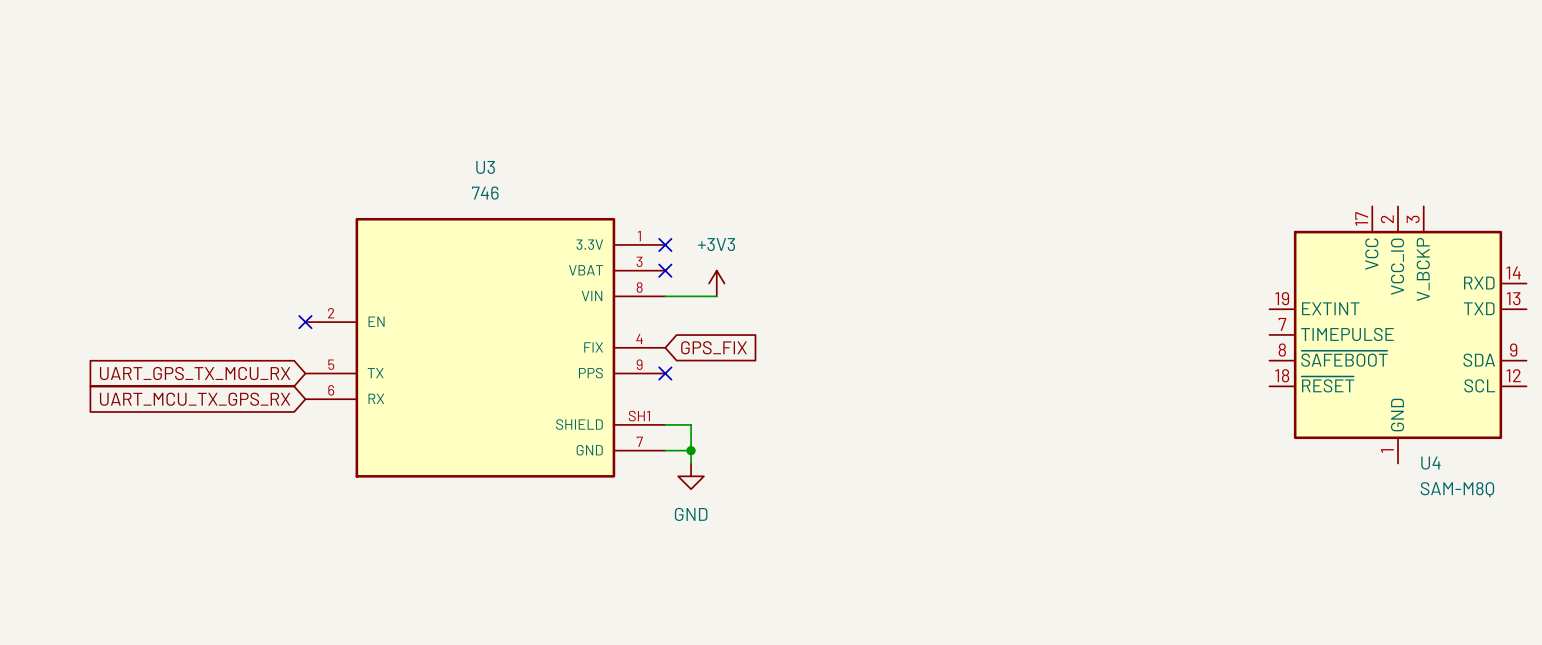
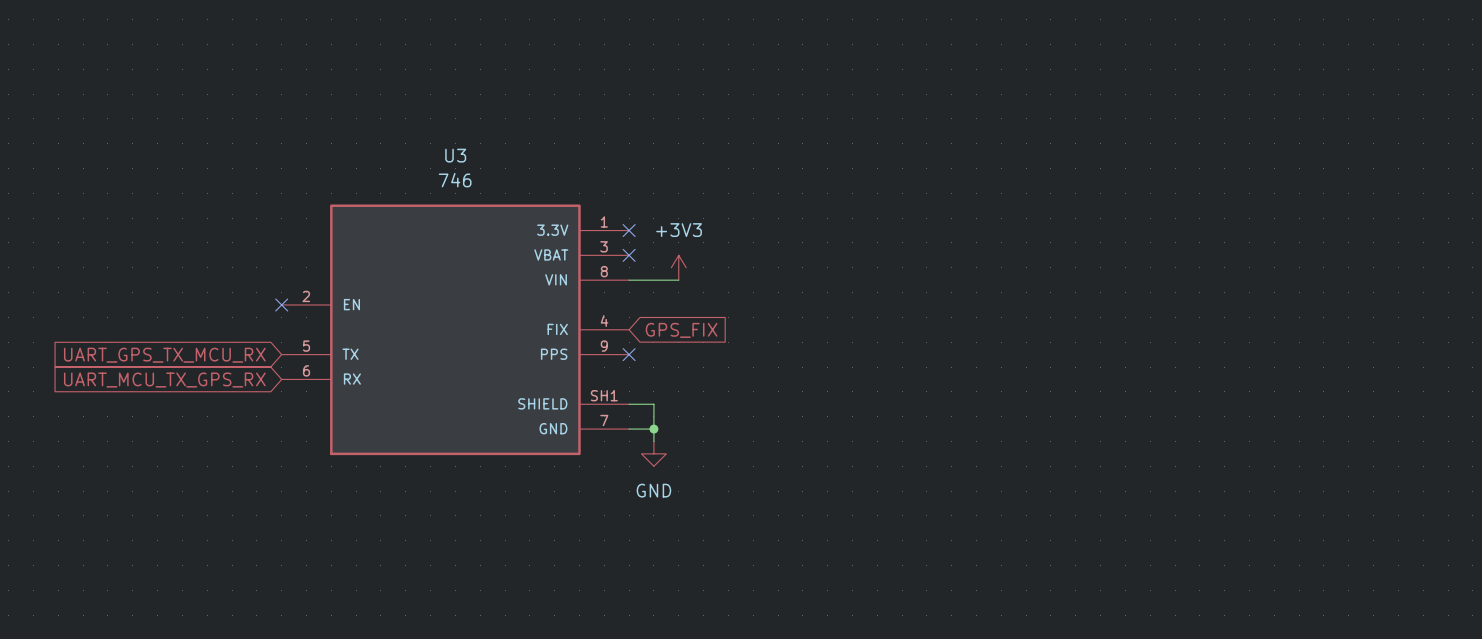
U4: SAM-M8Q (1398, 334) -> none

